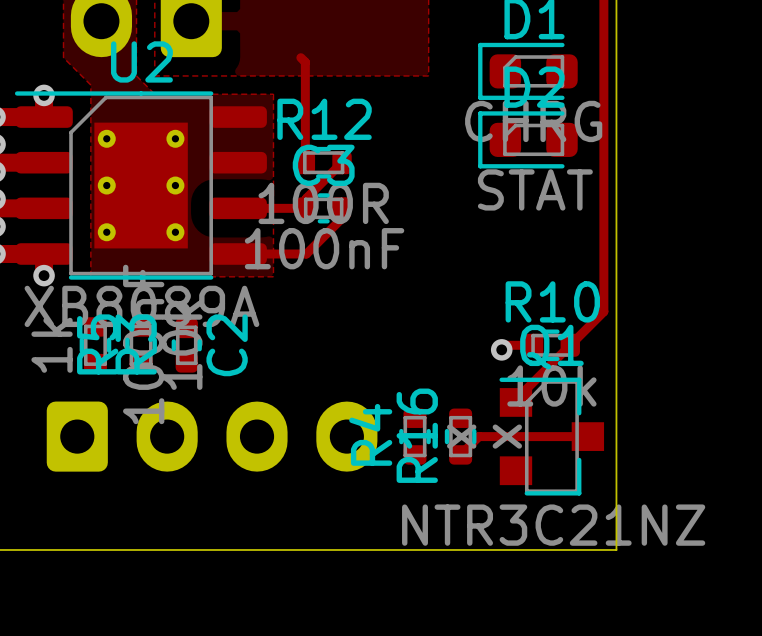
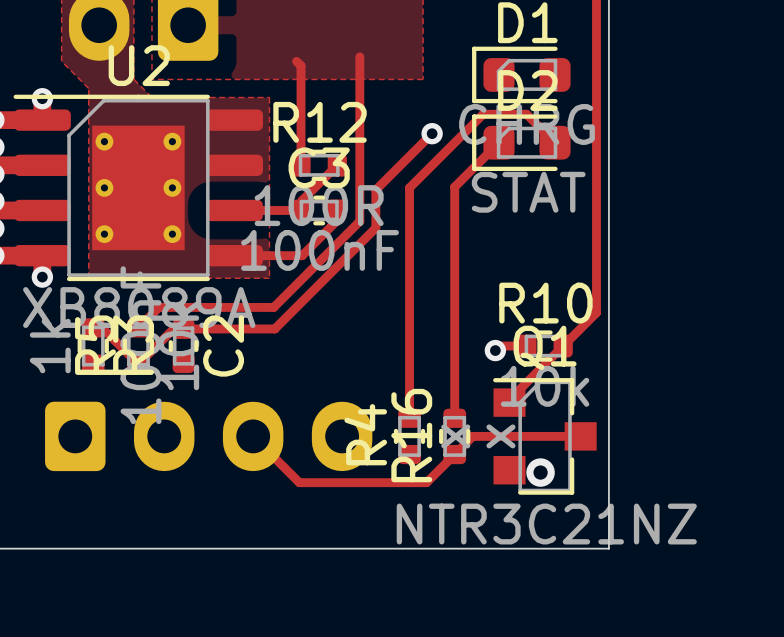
track: none -> (359, 56) (359, 221) (273, 307) (158, 307) (138, 327)
track: none -> (432, 133) (375, 189) (375, 227) (274, 328) (173, 328) (138, 364) (102, 327) (93, 327)
via: none -> (432, 133)
track: none -> (498, 142) (454, 186) (454, 418)
track: none -> (555, 142) (526, 114) (483, 114) (409, 187) (409, 418)
track: none -> (253, 436) (299, 482) (426, 482) (454, 454)
via: none -> (540, 472)

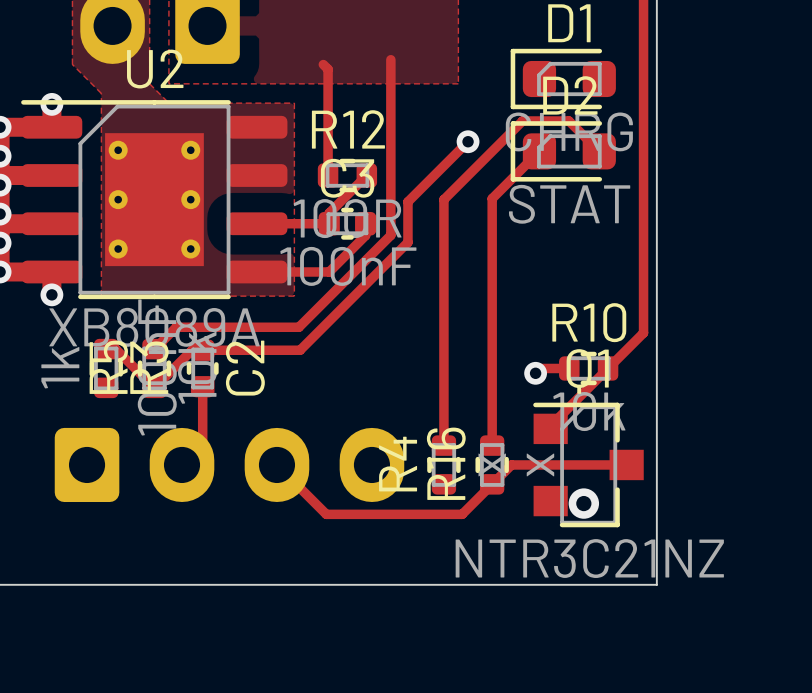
track: none -> (202, 386) (202, 444) (182, 464)

